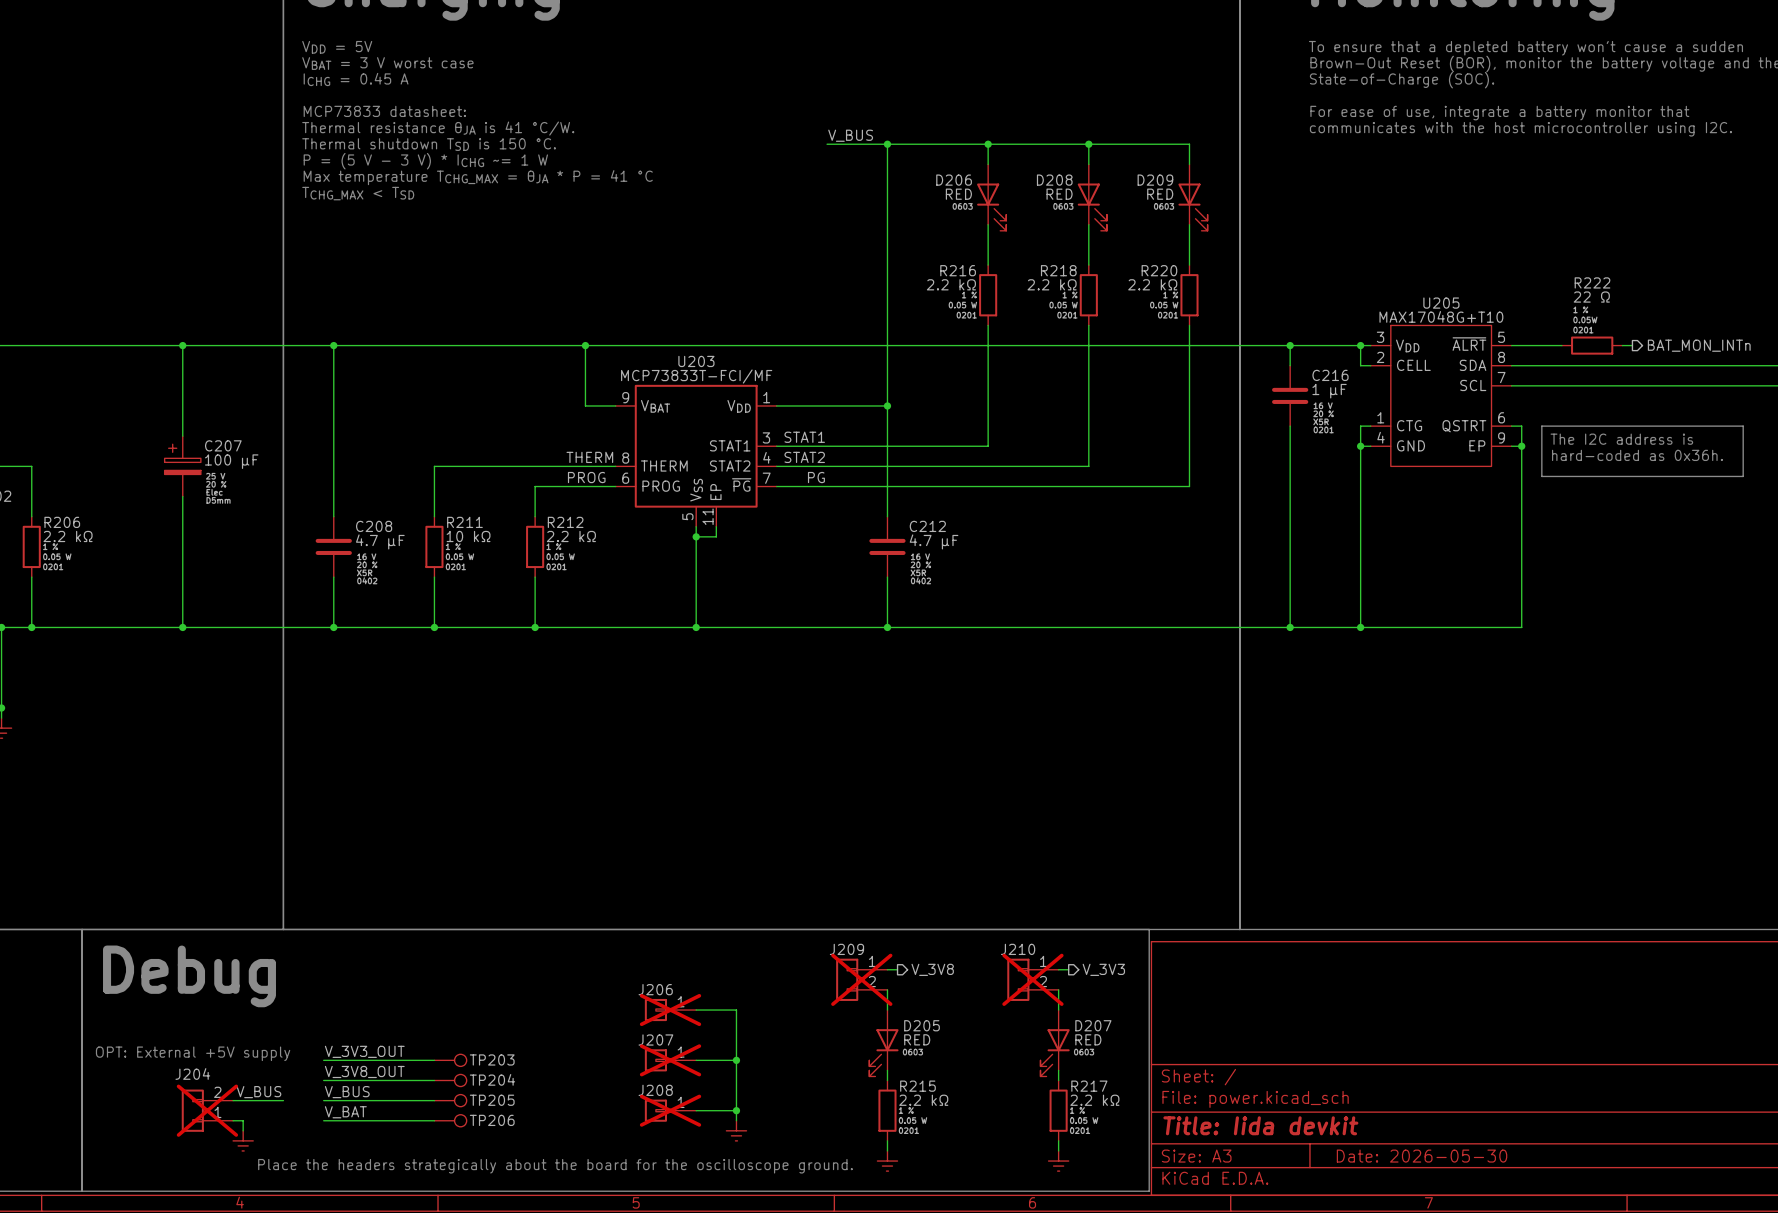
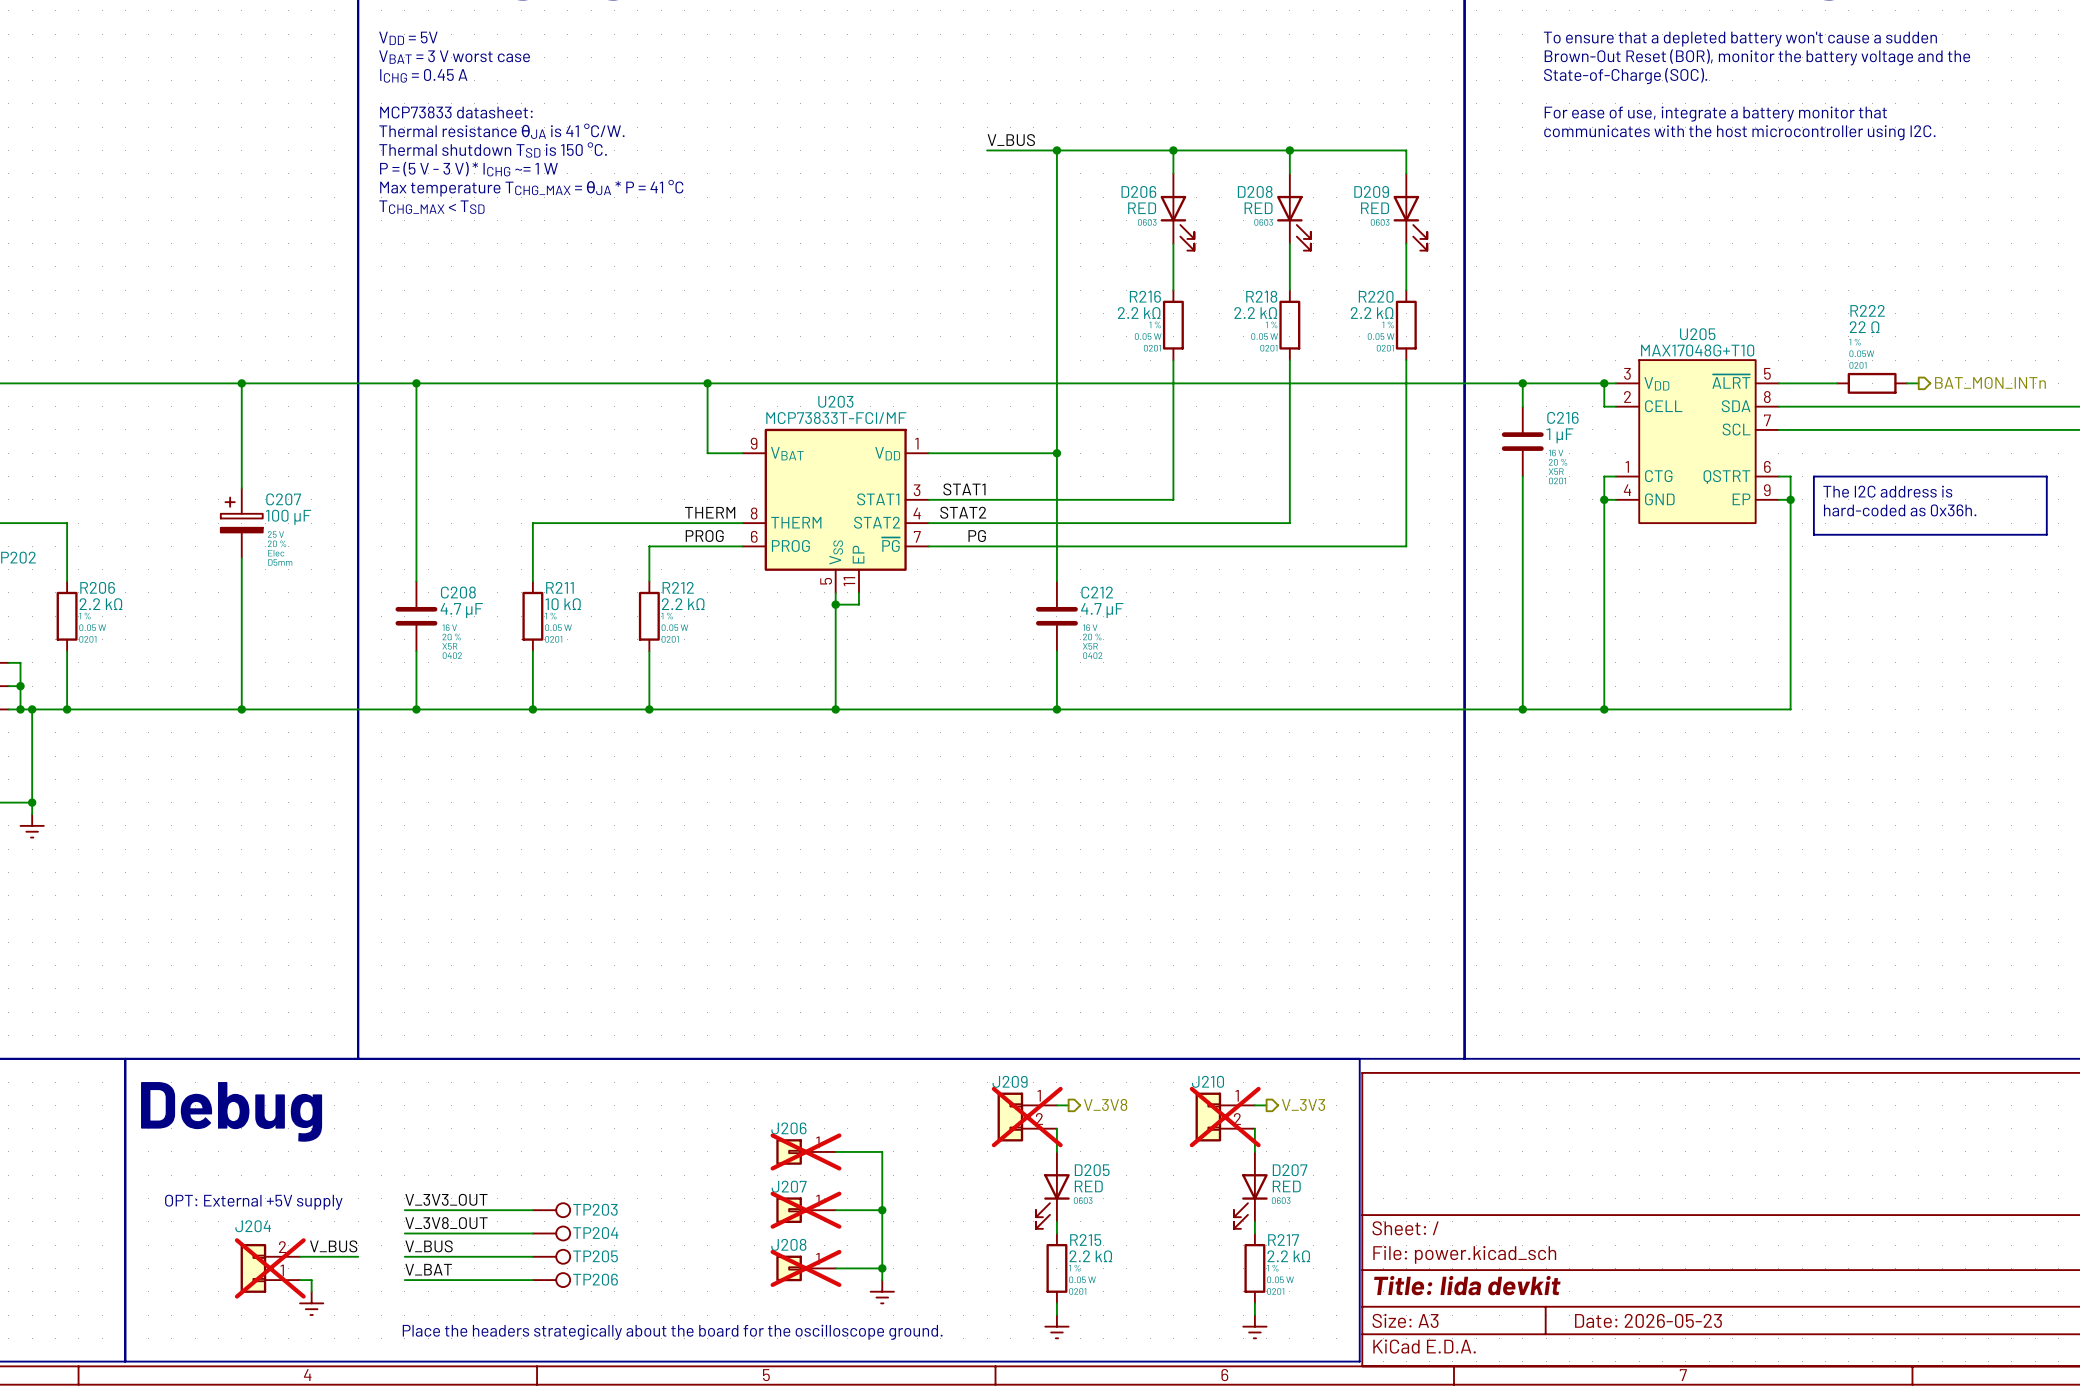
title block: Date: 2026-05-30 (1422, 1156) -> Date: 2026-05-23 (1648, 1320)

